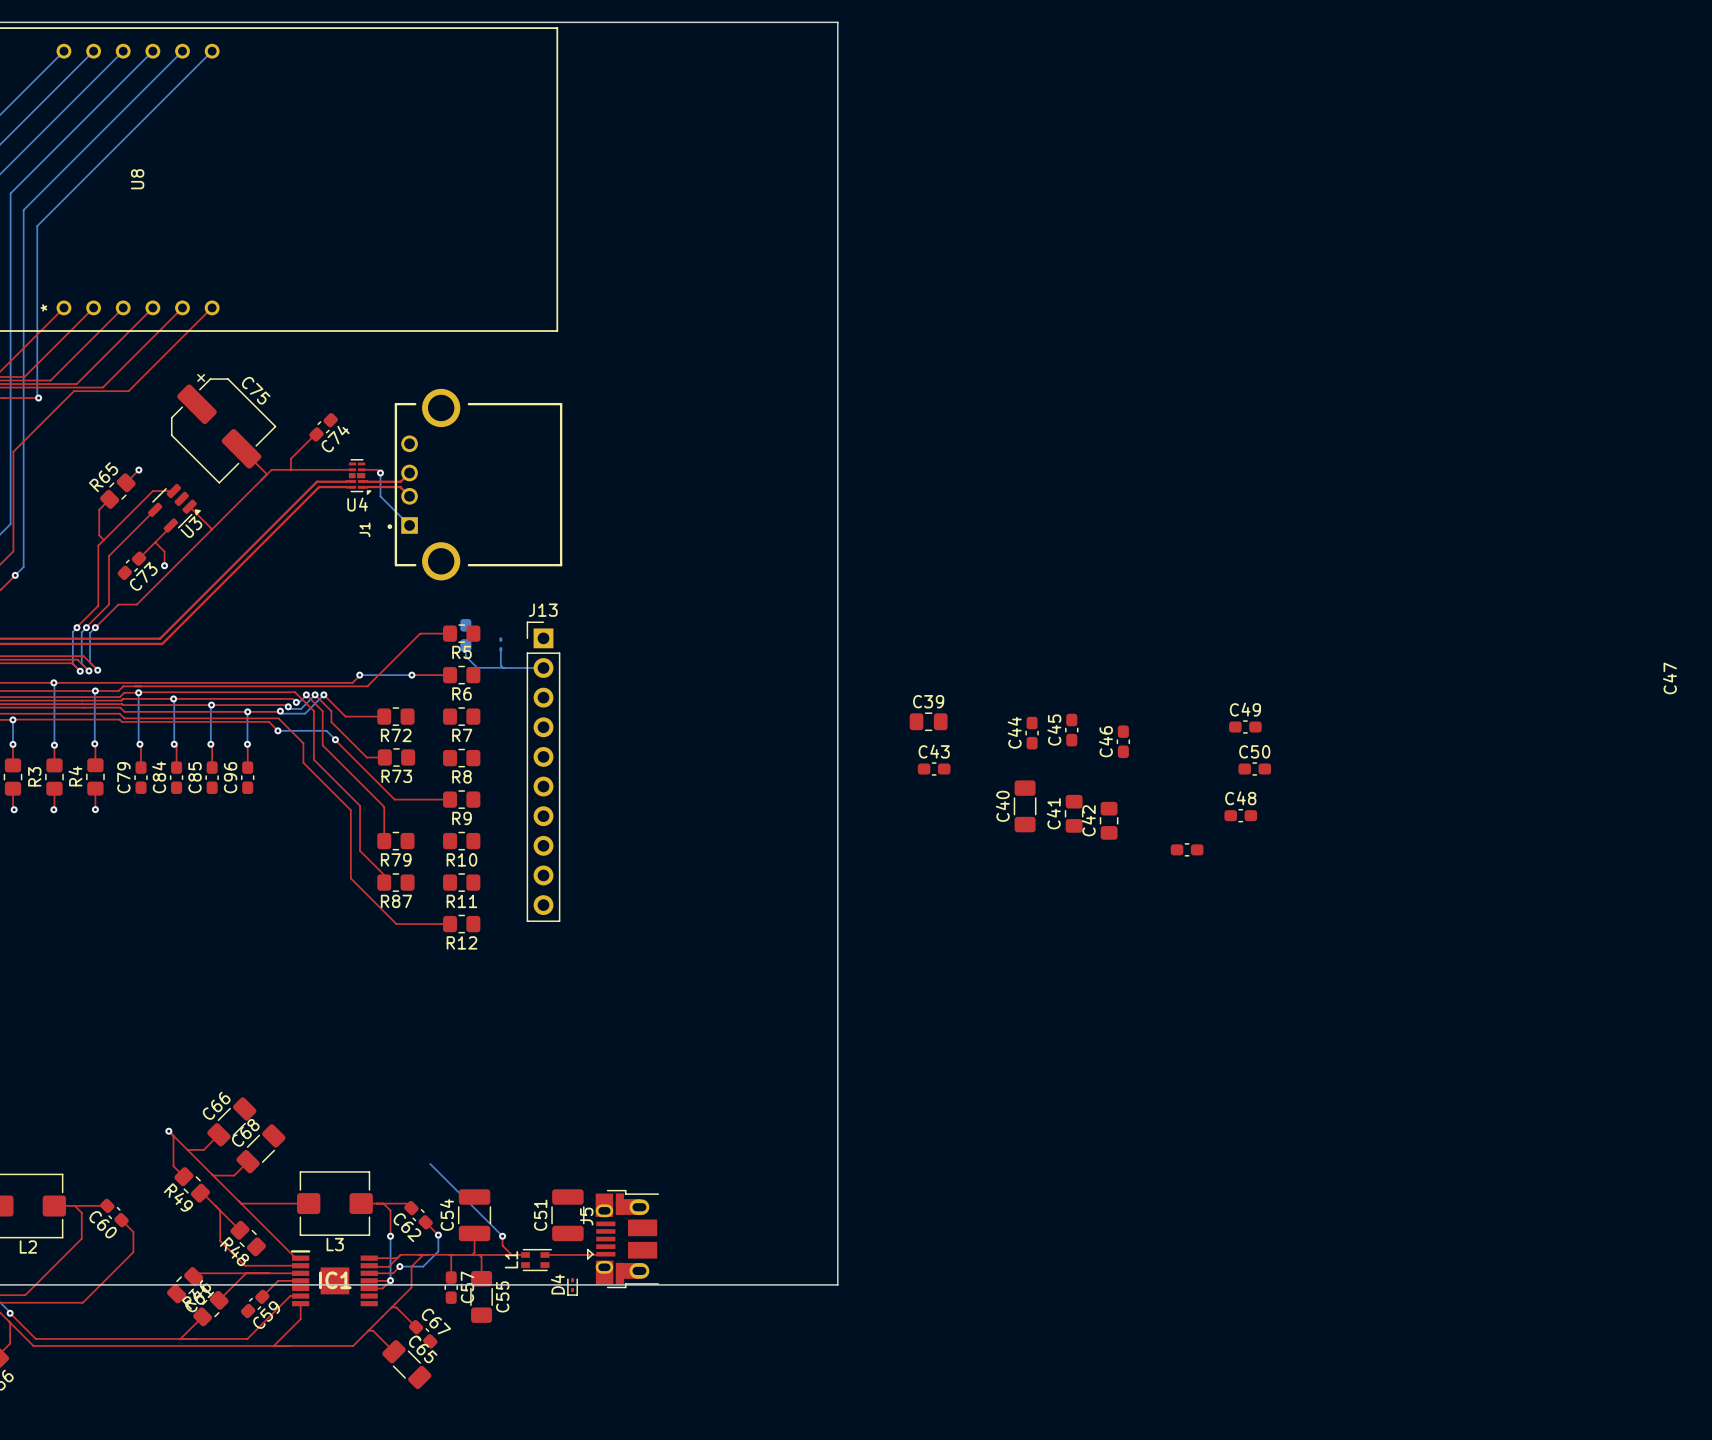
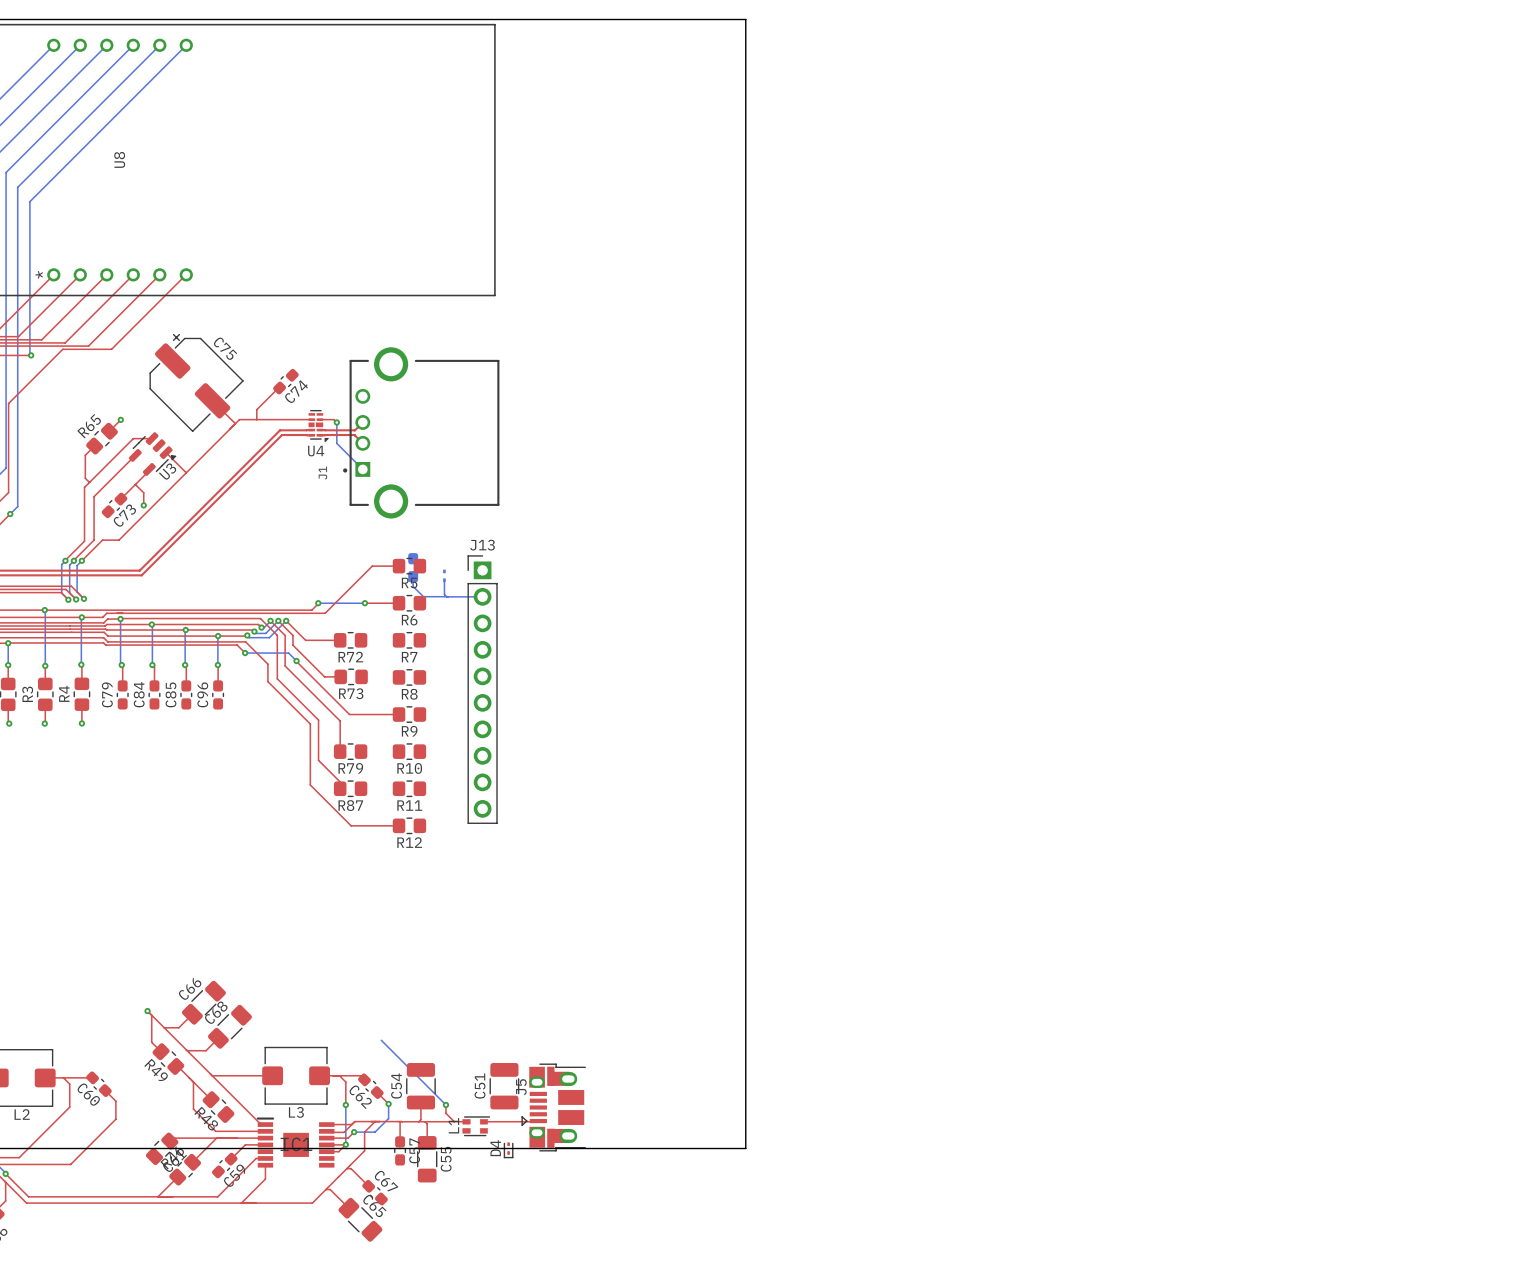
C39: (928, 721) -> none
C49: (1245, 726) -> none
C45: (1071, 730) -> none
C44: (1032, 733) -> none
C46: (1123, 741) -> none
C43: (934, 769) -> none
C50: (1254, 769) -> none
C40: (1025, 806) -> none
C41: (1074, 813) -> none
C48: (1240, 815) -> none
C42: (1109, 820) -> none
C47: (1187, 849) -> none

